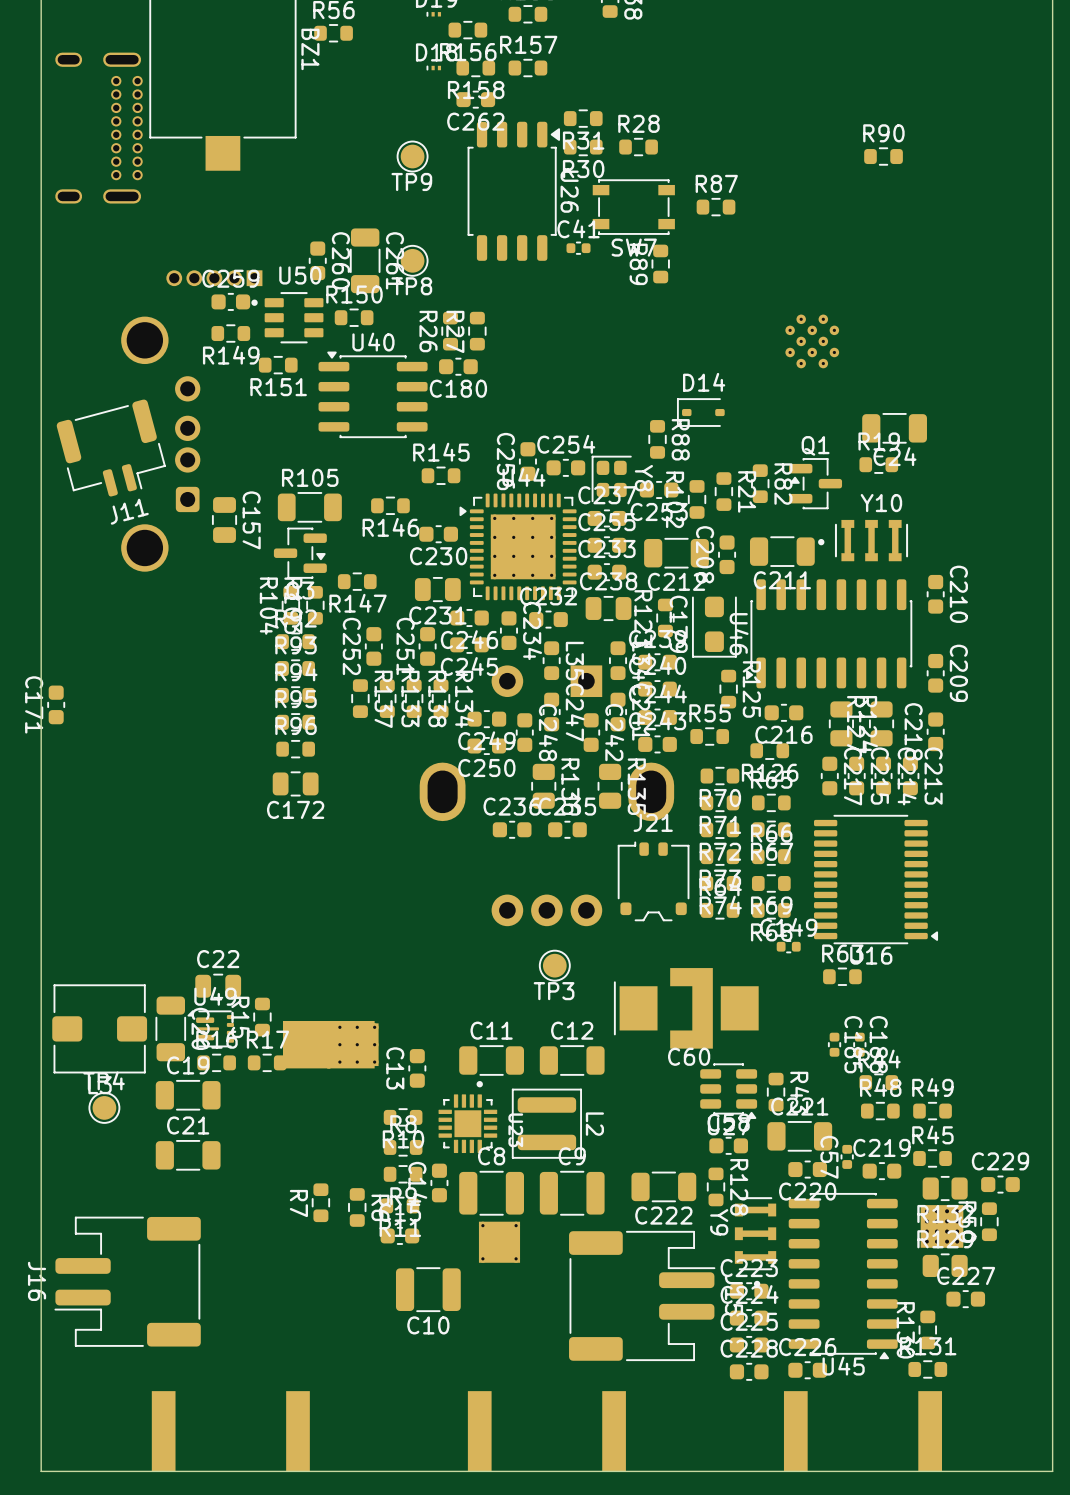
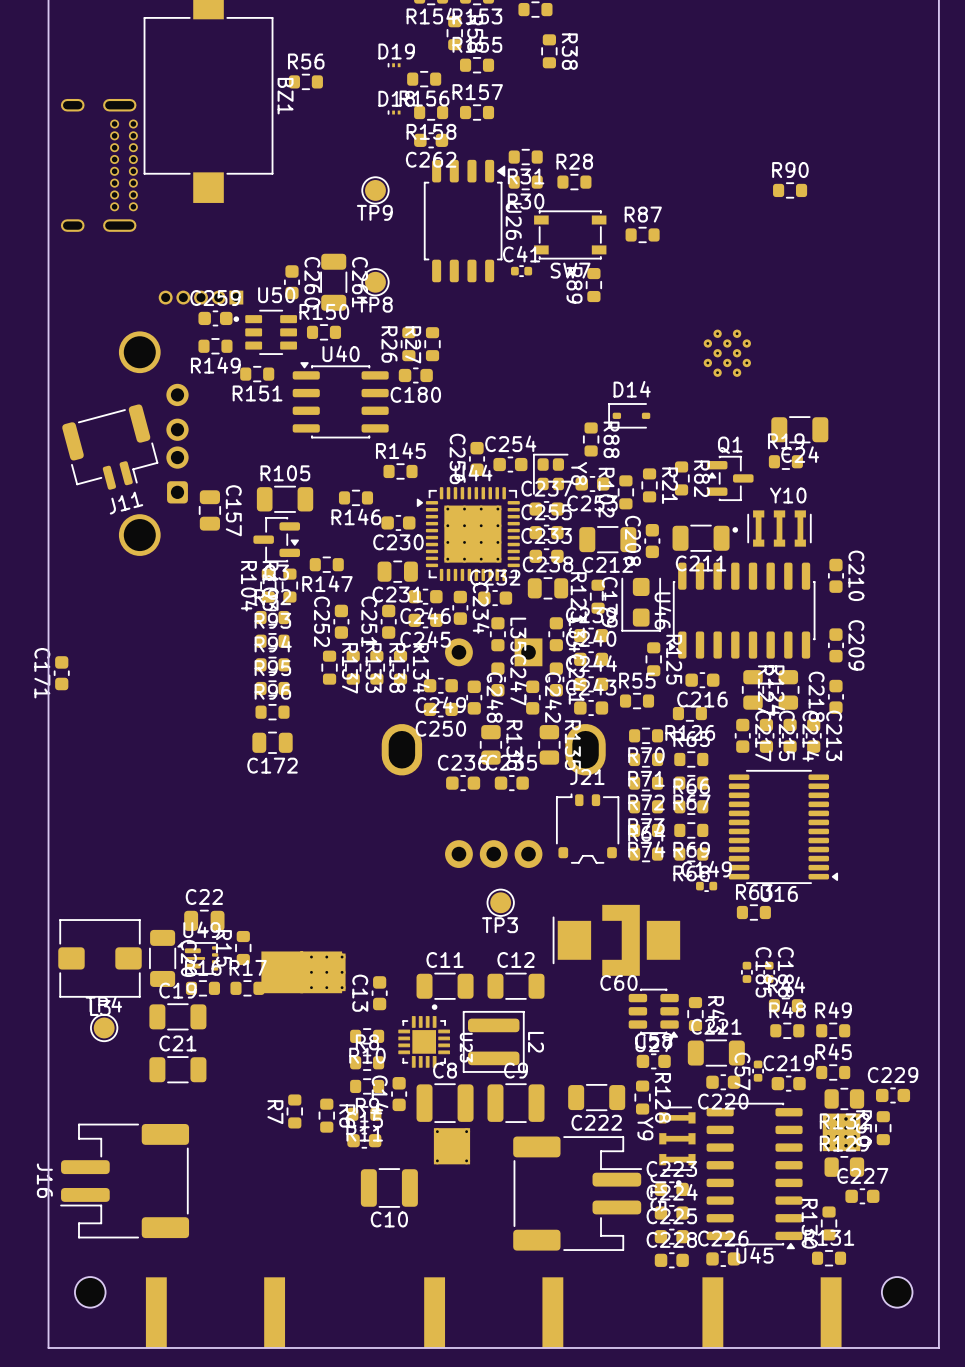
part: none -> (90, 1292)
part: none -> (897, 1292)

